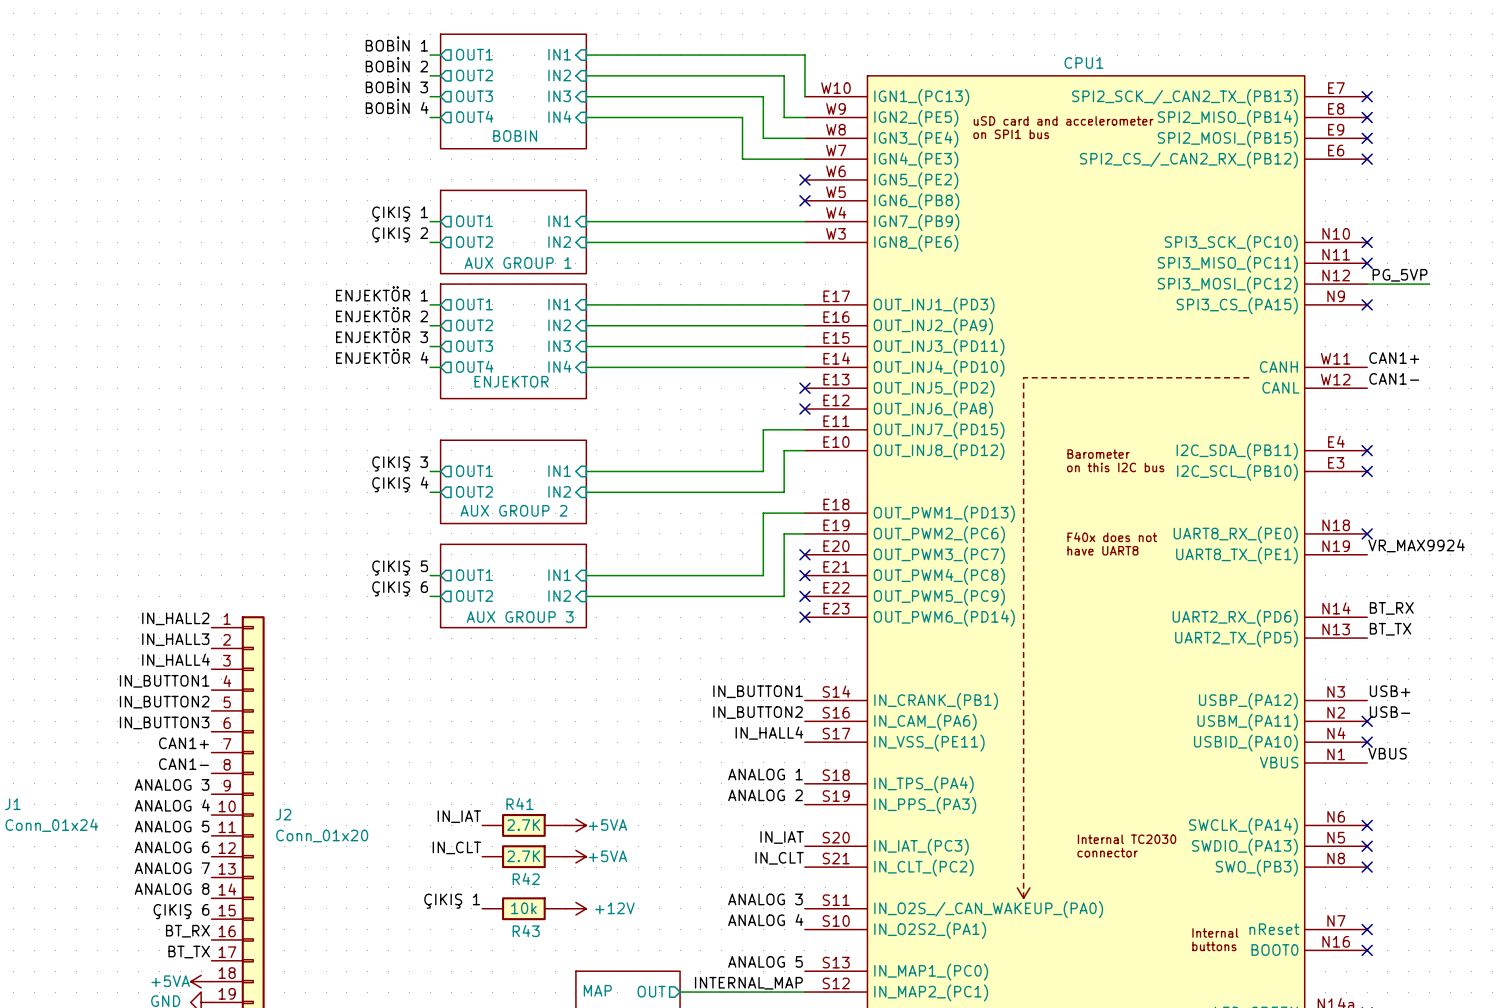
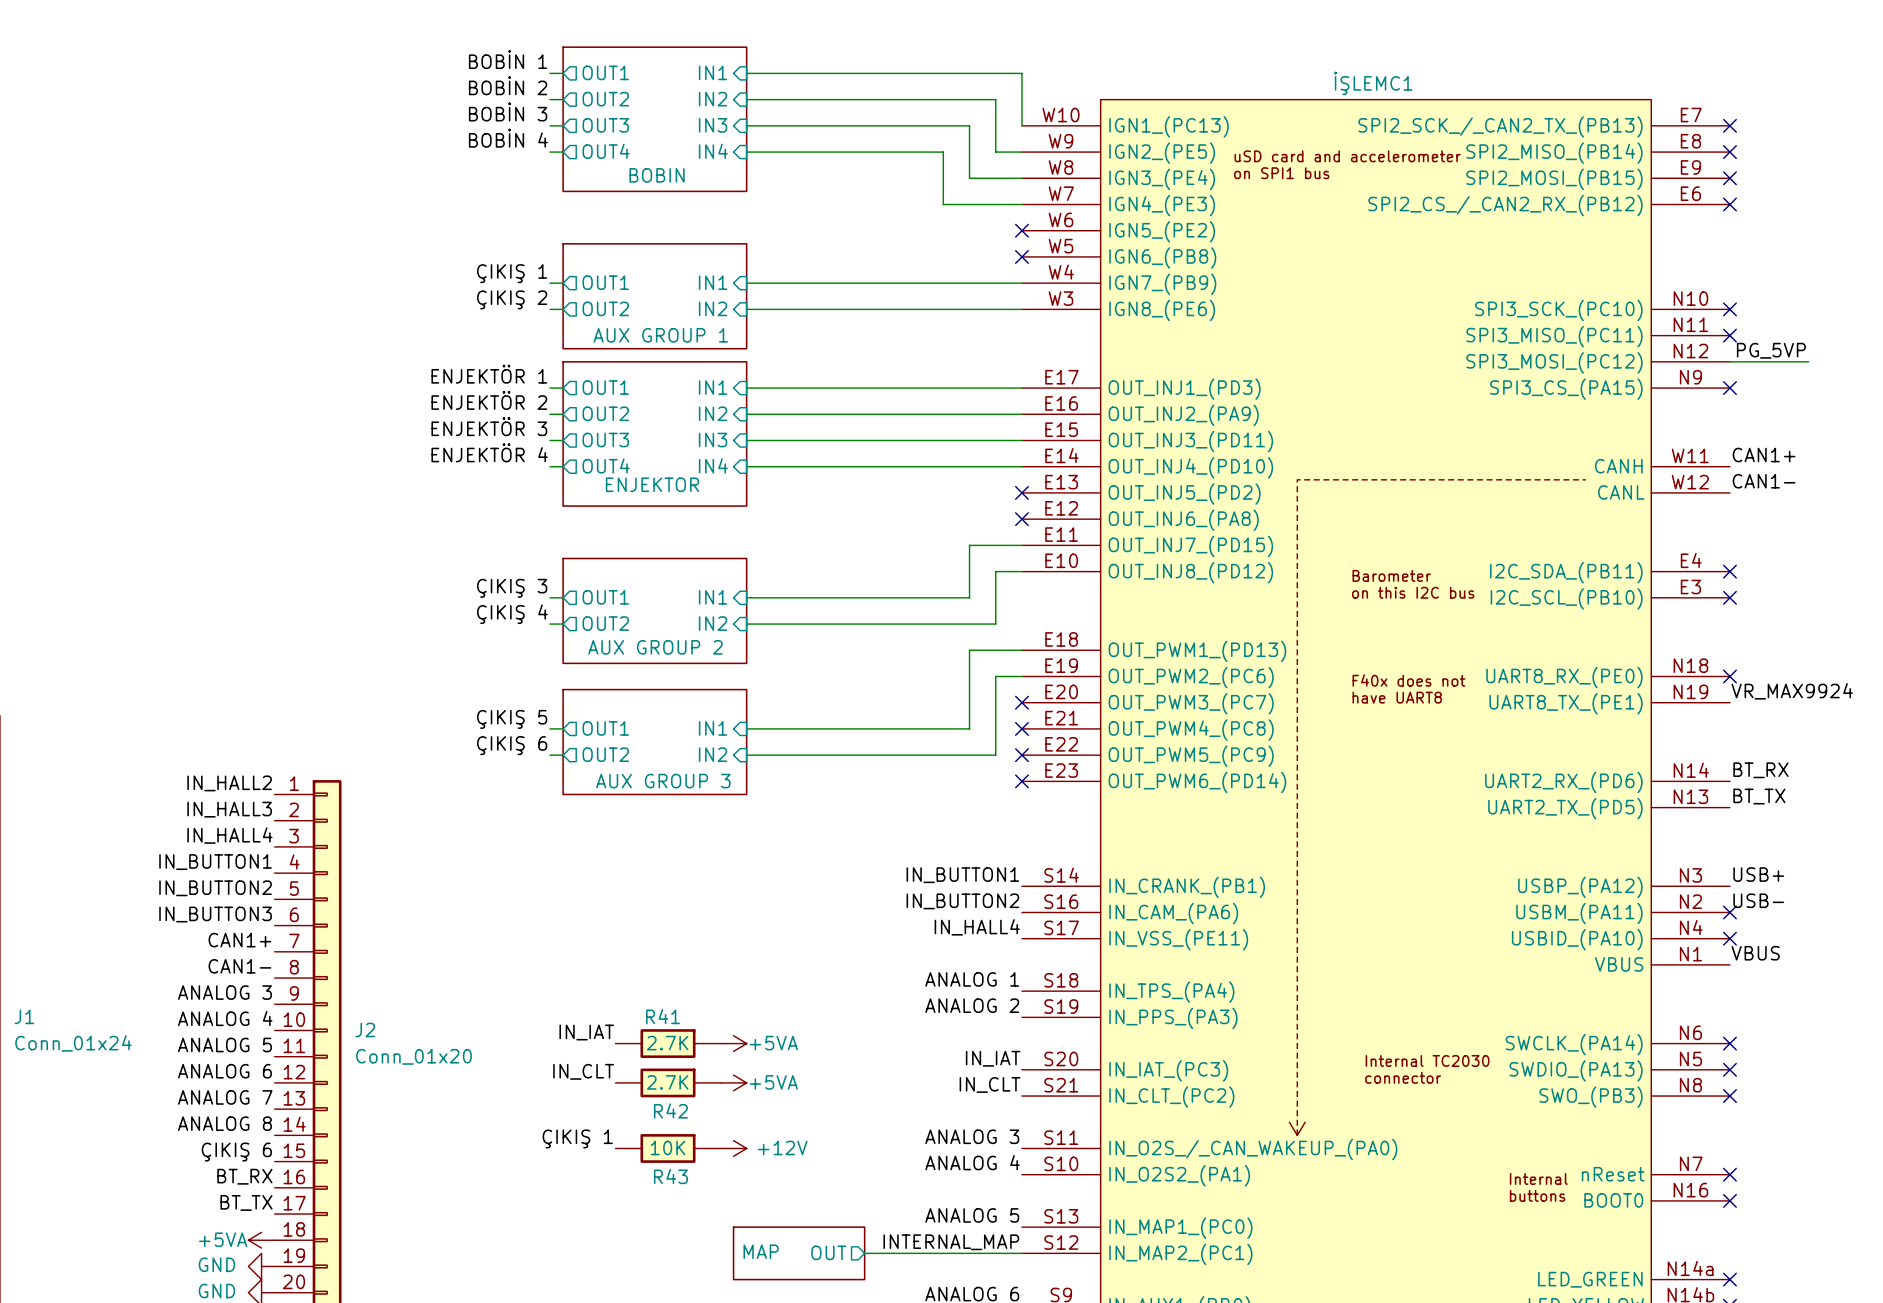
CPU1 name: CPU1 (1083, 62) -> İŞLEMC1 (1373, 83)
R43 value: 10k (523, 908) -> 10K (667, 1147)

